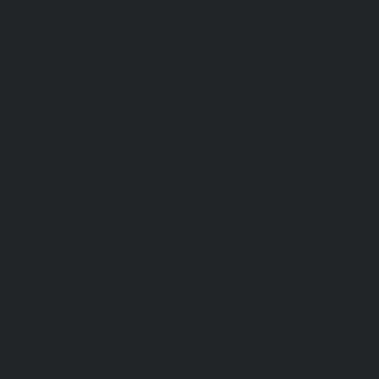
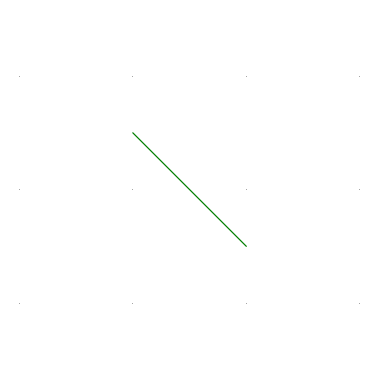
wire: none -> (132, 132) (246, 246)

